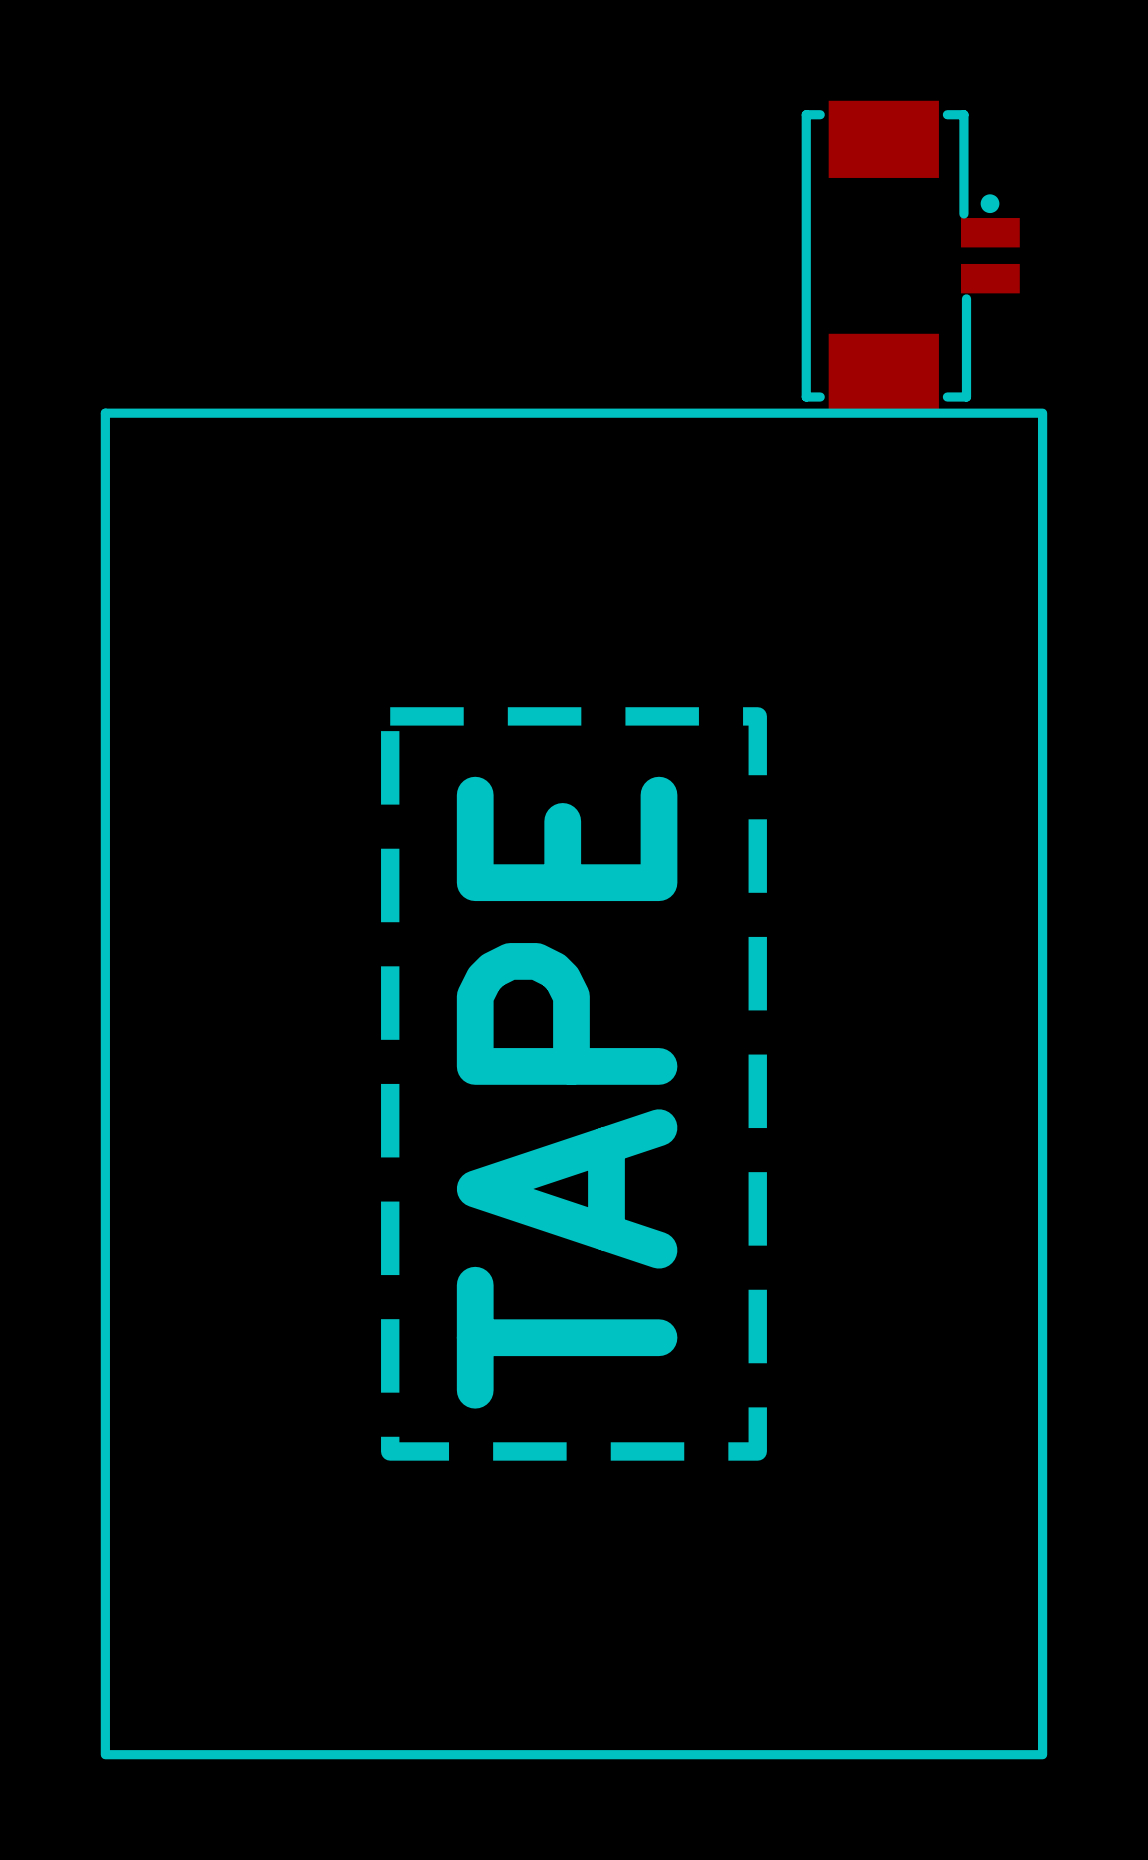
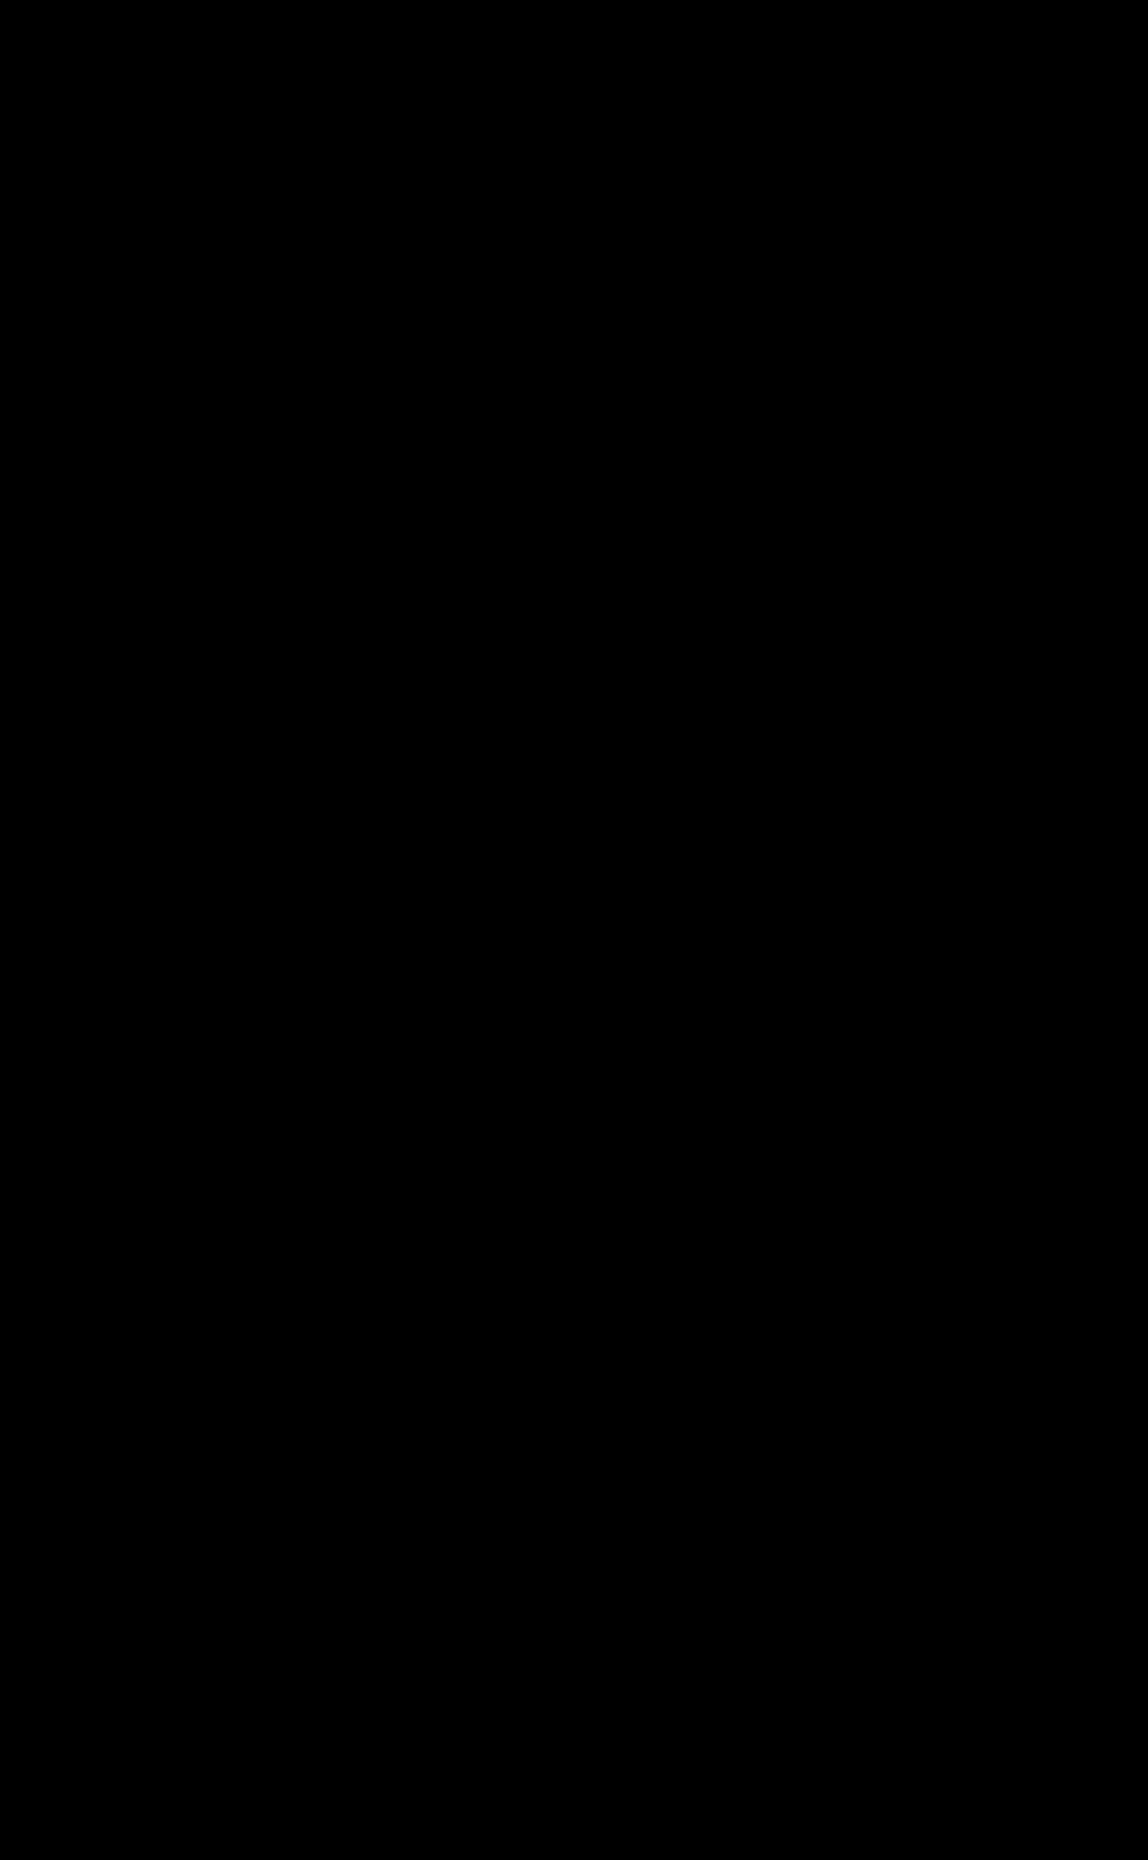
part: (910, 255) -> none
drawing: [100, 408, 1048, 1760] -> none

